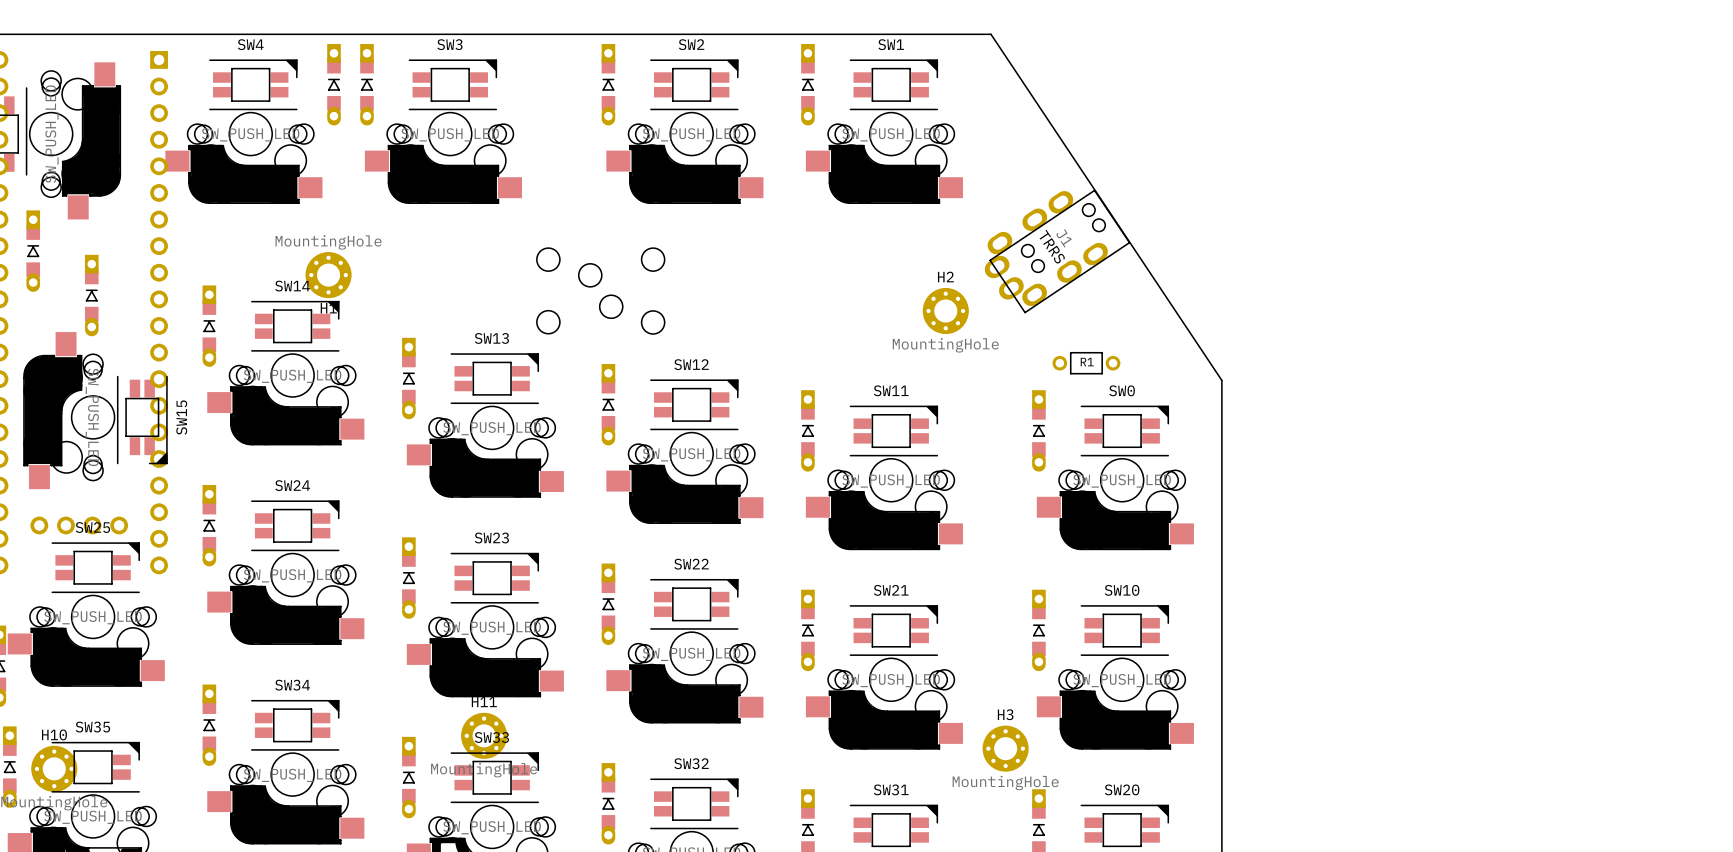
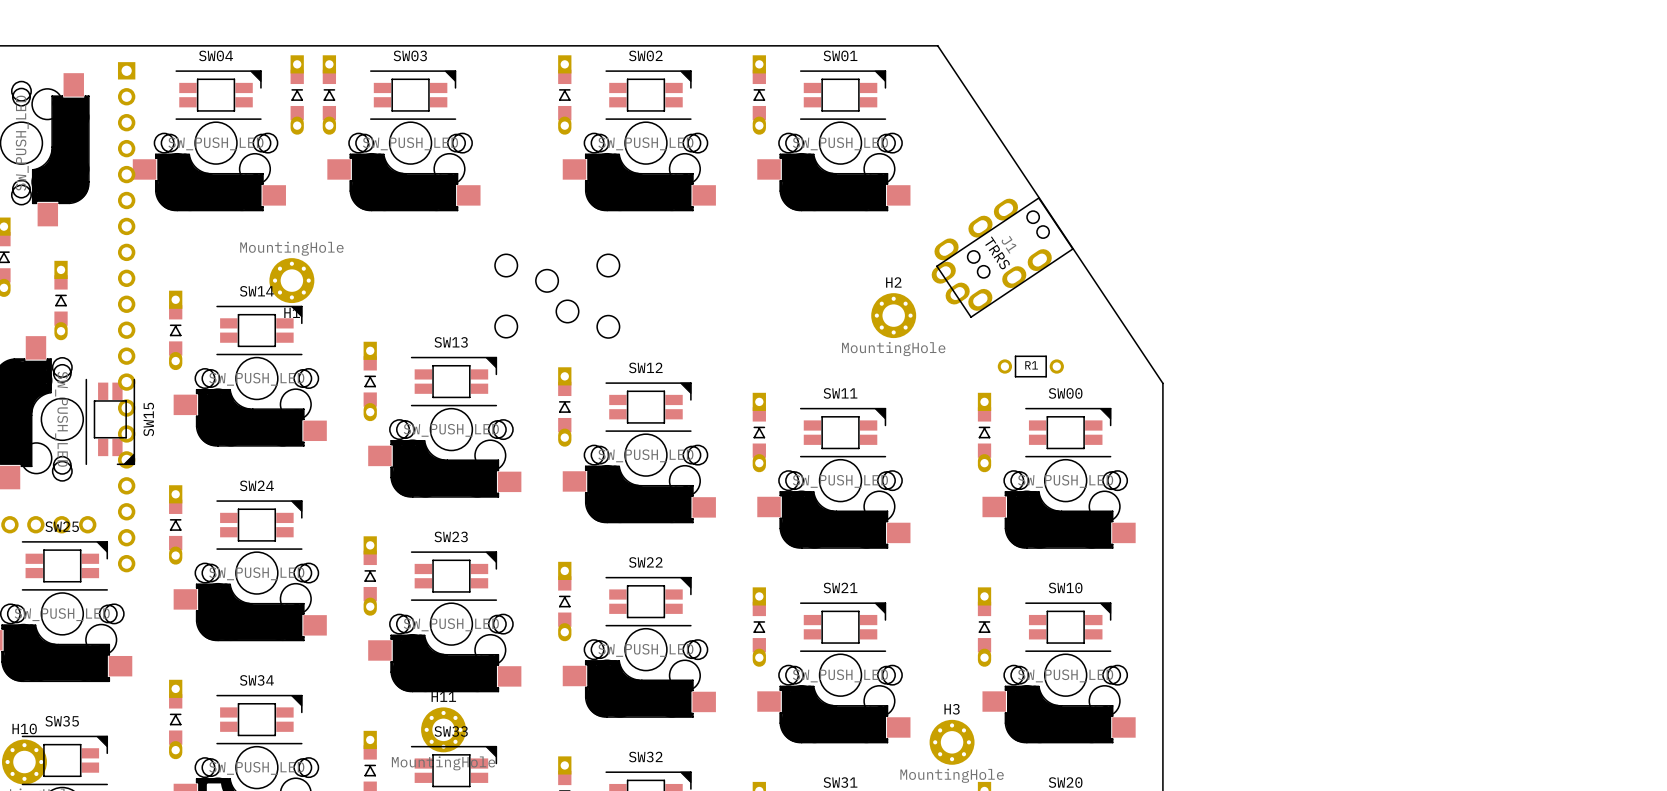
SW4 name: SW4 (250, 44) -> SW04 (216, 55)
SW3 name: SW3 (449, 44) -> SW03 (410, 55)
SW2 name: SW2 (691, 44) -> SW02 (645, 55)
SW1 name: SW1 (891, 44) -> SW01 (840, 55)
SW0 name: SW0 (1122, 390) -> SW00 (1065, 393)

